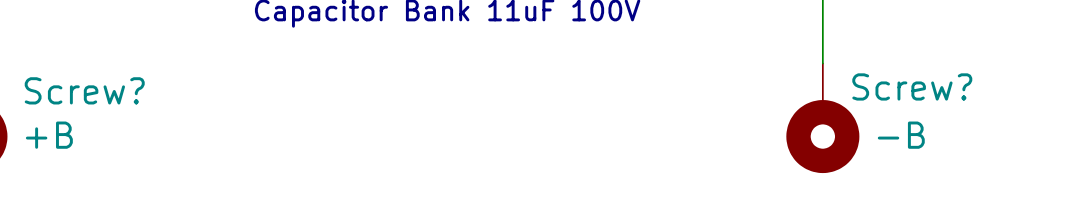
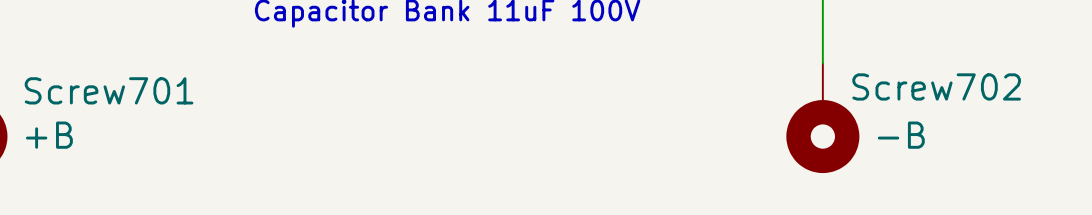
Screw? name: Screw? (912, 86) -> Screw702 (936, 86)
Screw? name: Screw? (84, 90) -> Screw701 (109, 90)

